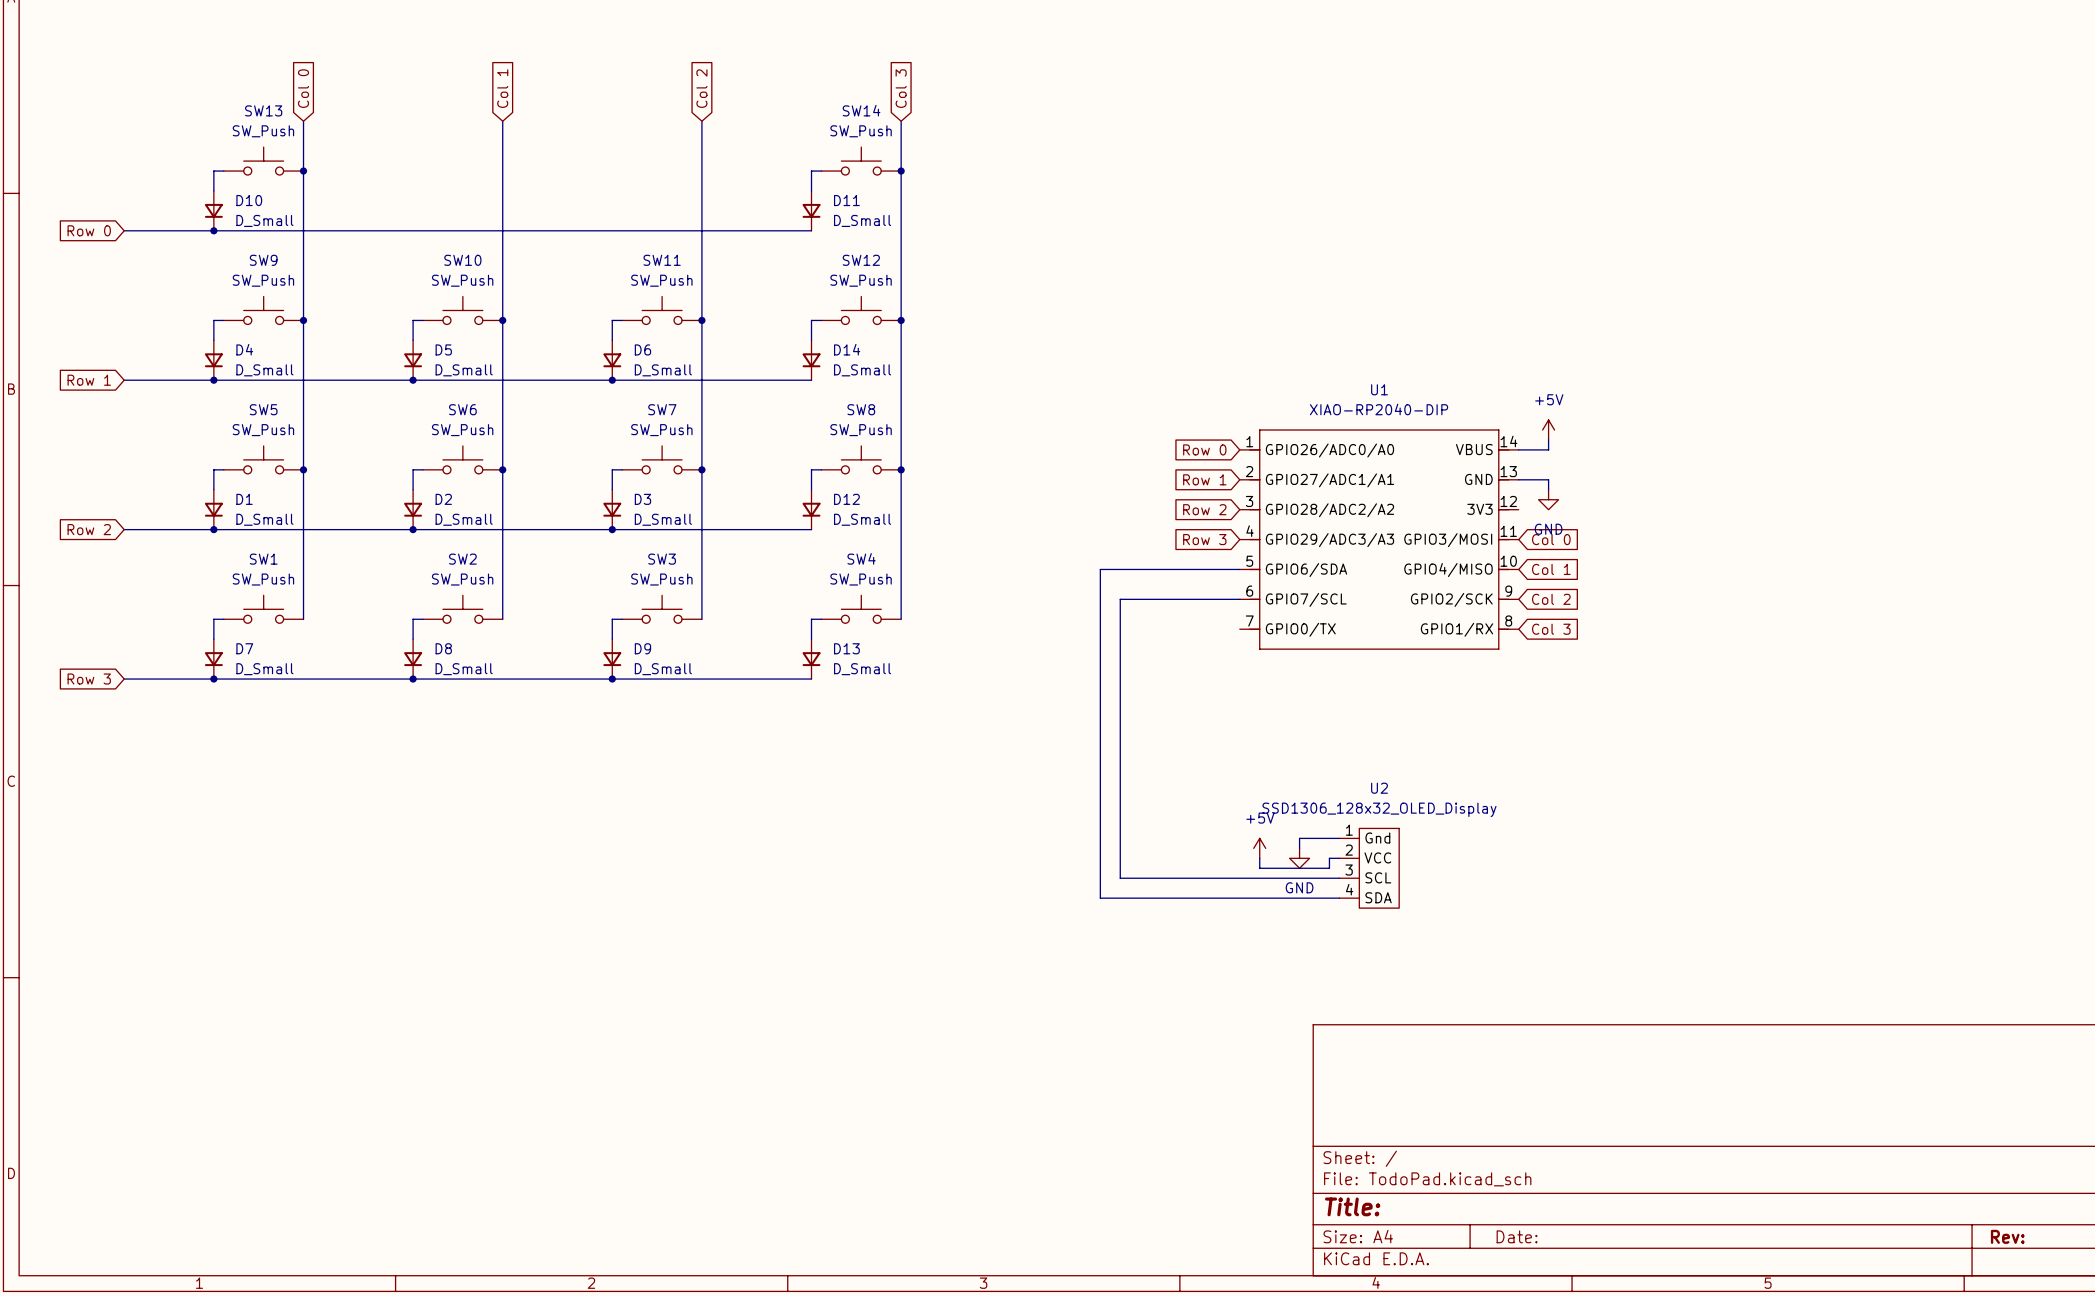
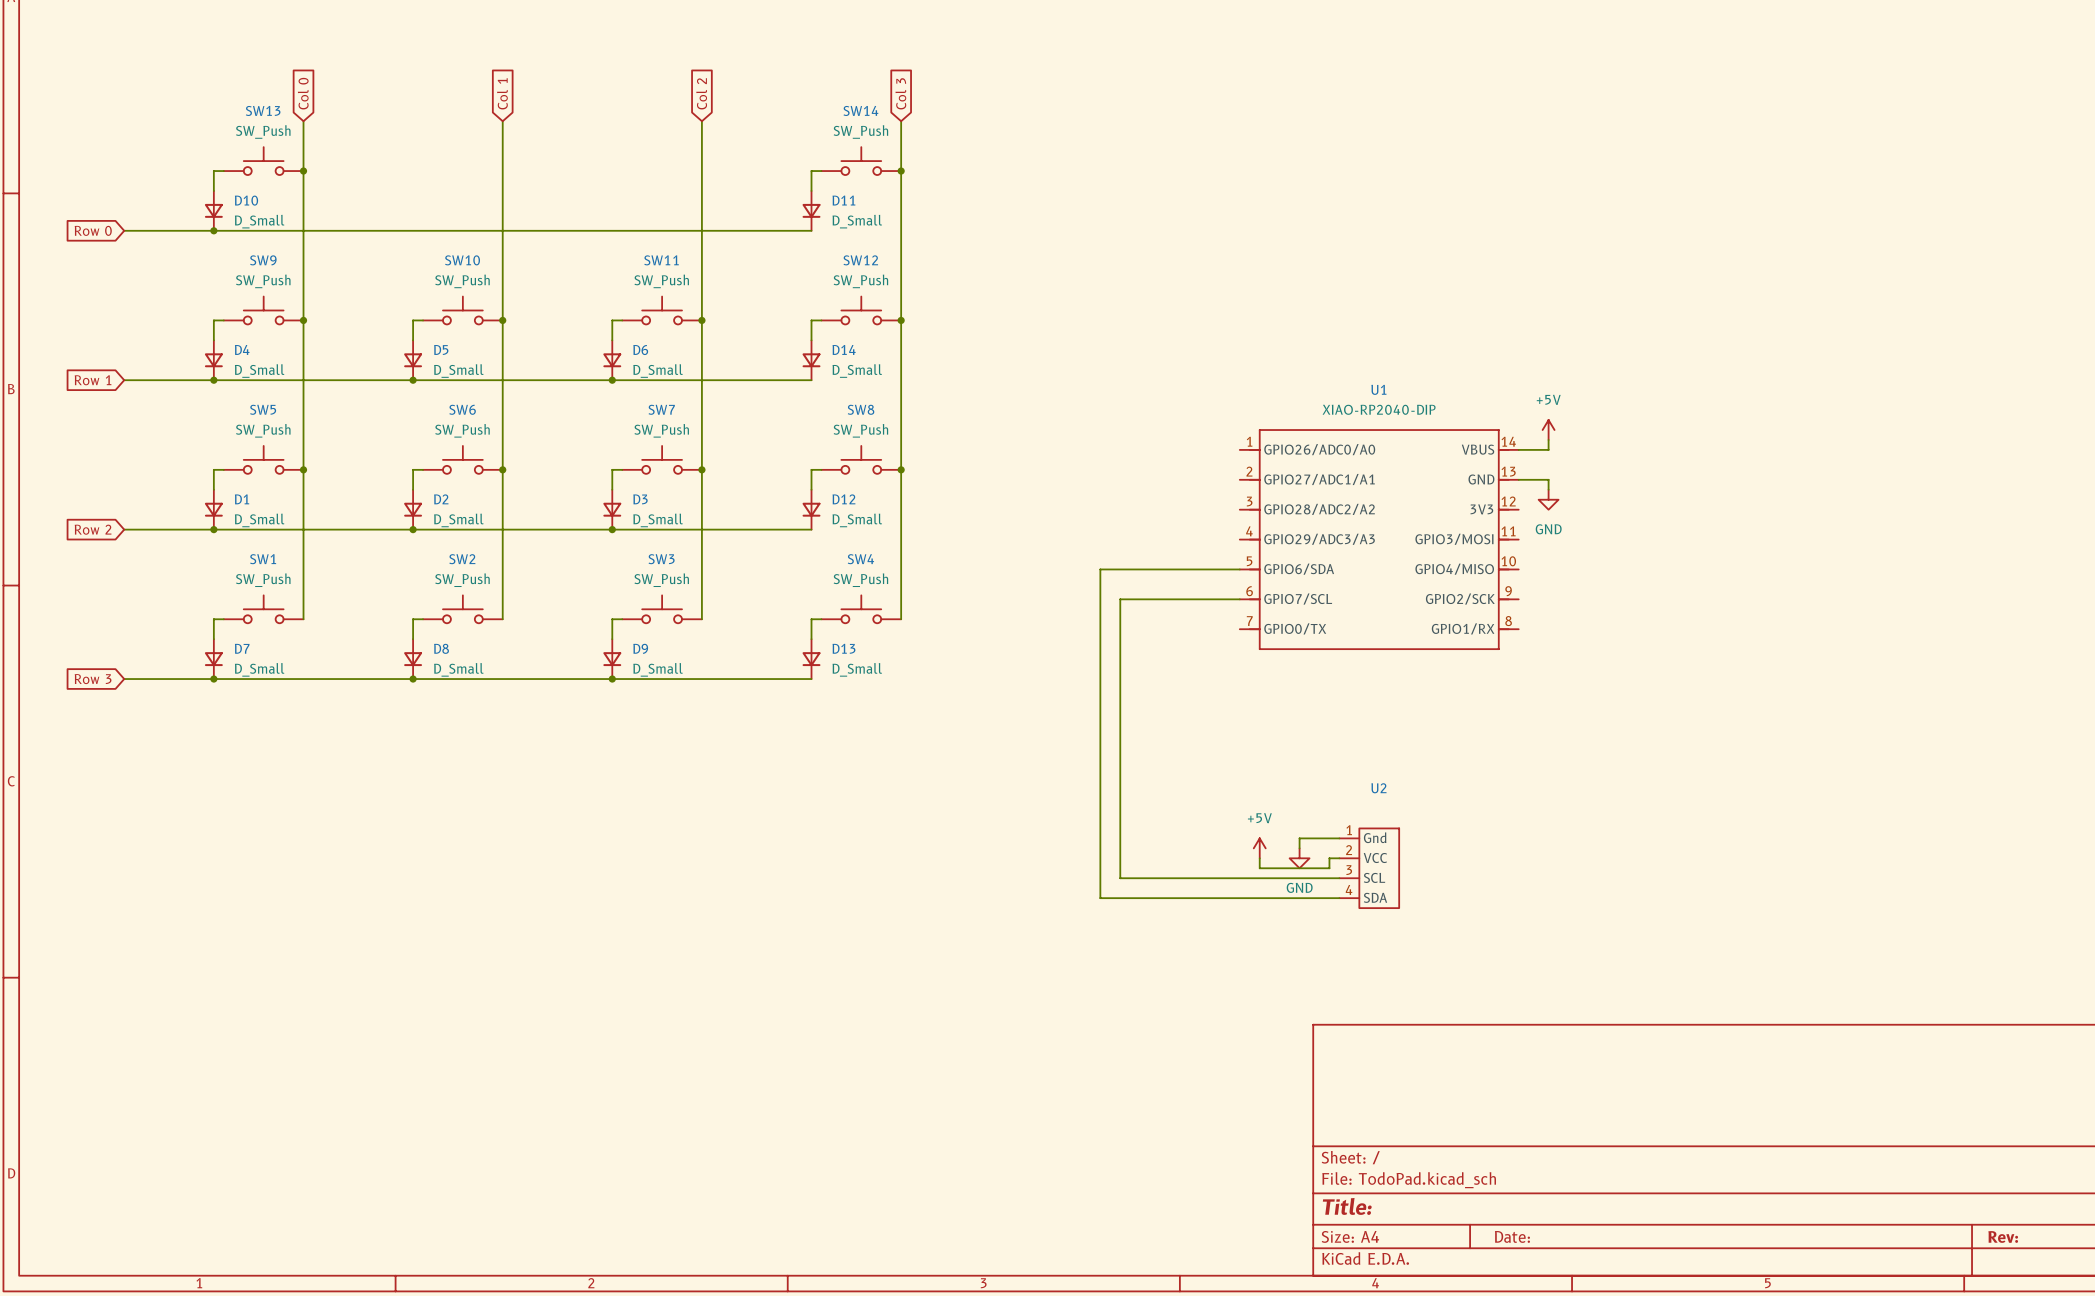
global label: Row 0 (1204, 449) -> none
global label: Row 1 (1204, 479) -> none
global label: Row 2 (1204, 509) -> none
global label: Row 3 (1204, 539) -> none
global label: Col 0 (1551, 539) -> none
global label: Col 1 (1551, 569) -> none
global label: Col 2 (1551, 599) -> none
global label: Col 3 (1551, 629) -> none
U2 value: SSD1306_128x32_OLED_Display (1379, 809) -> none

